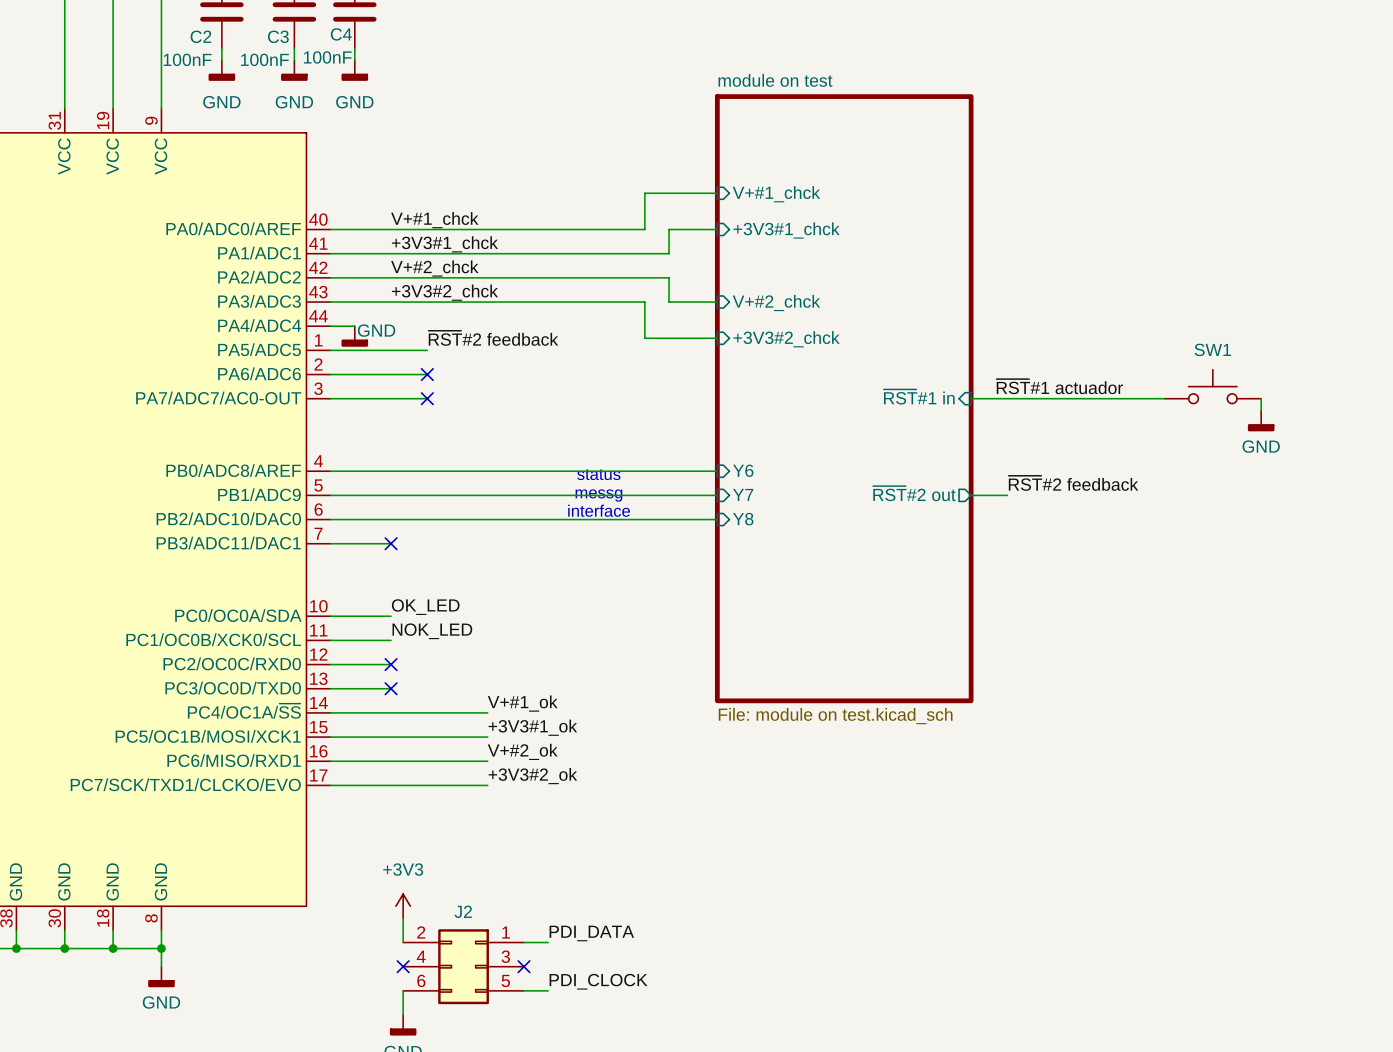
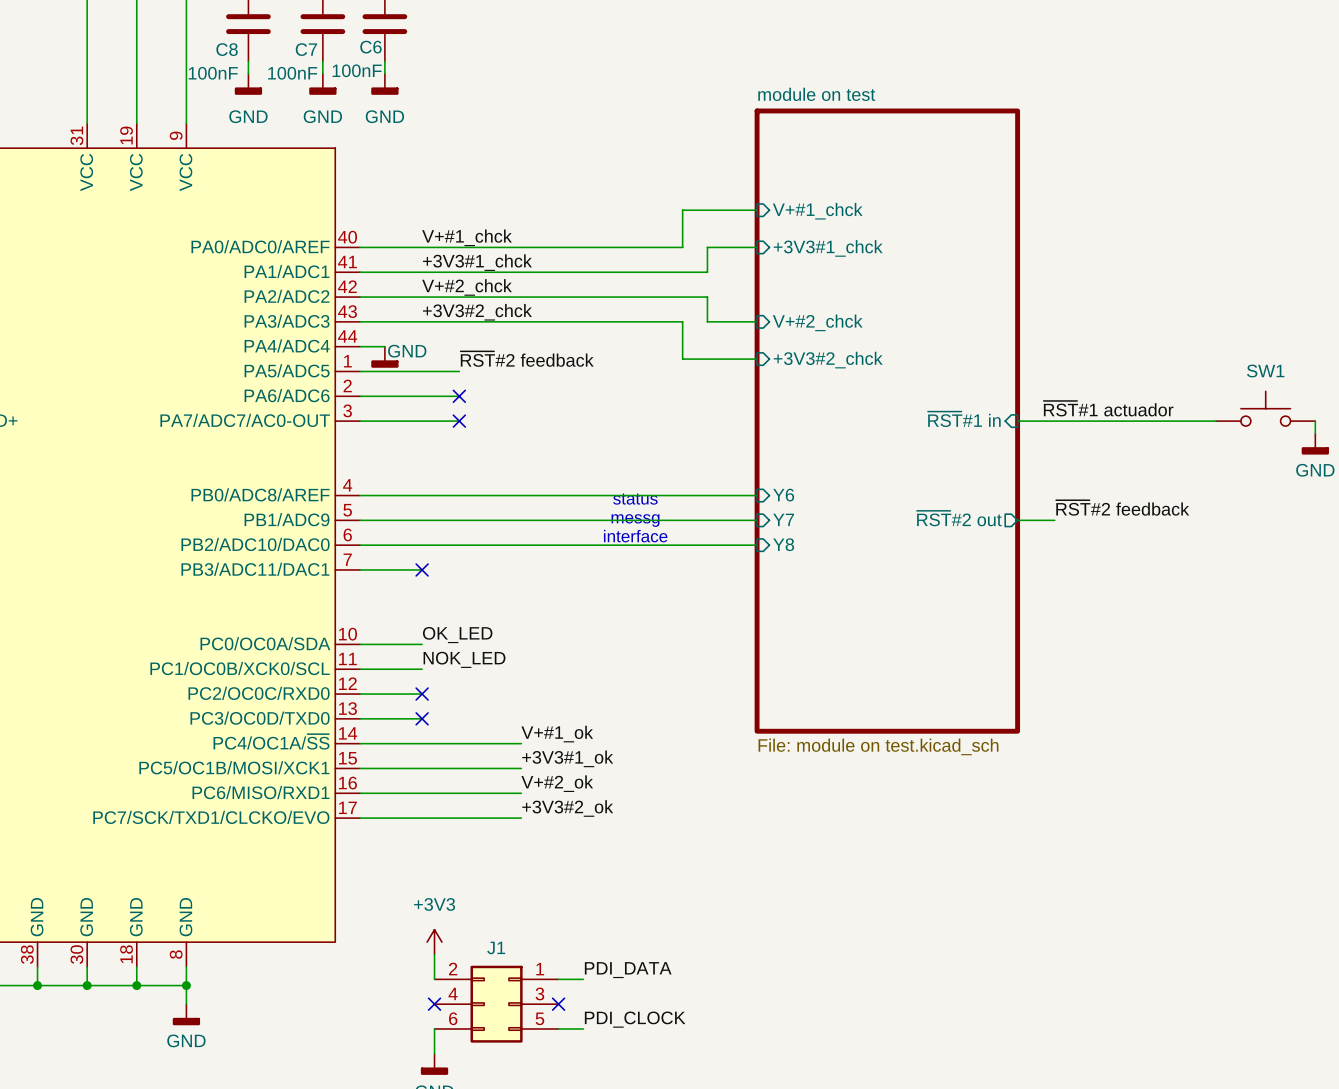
C4 name: C4 (341, 34) -> C6 (370, 47)
C2 name: C2 (200, 36) -> C8 (227, 49)
C3 name: C3 (278, 36) -> C7 (306, 49)
J2 name: J2 (463, 911) -> J1 (496, 947)

